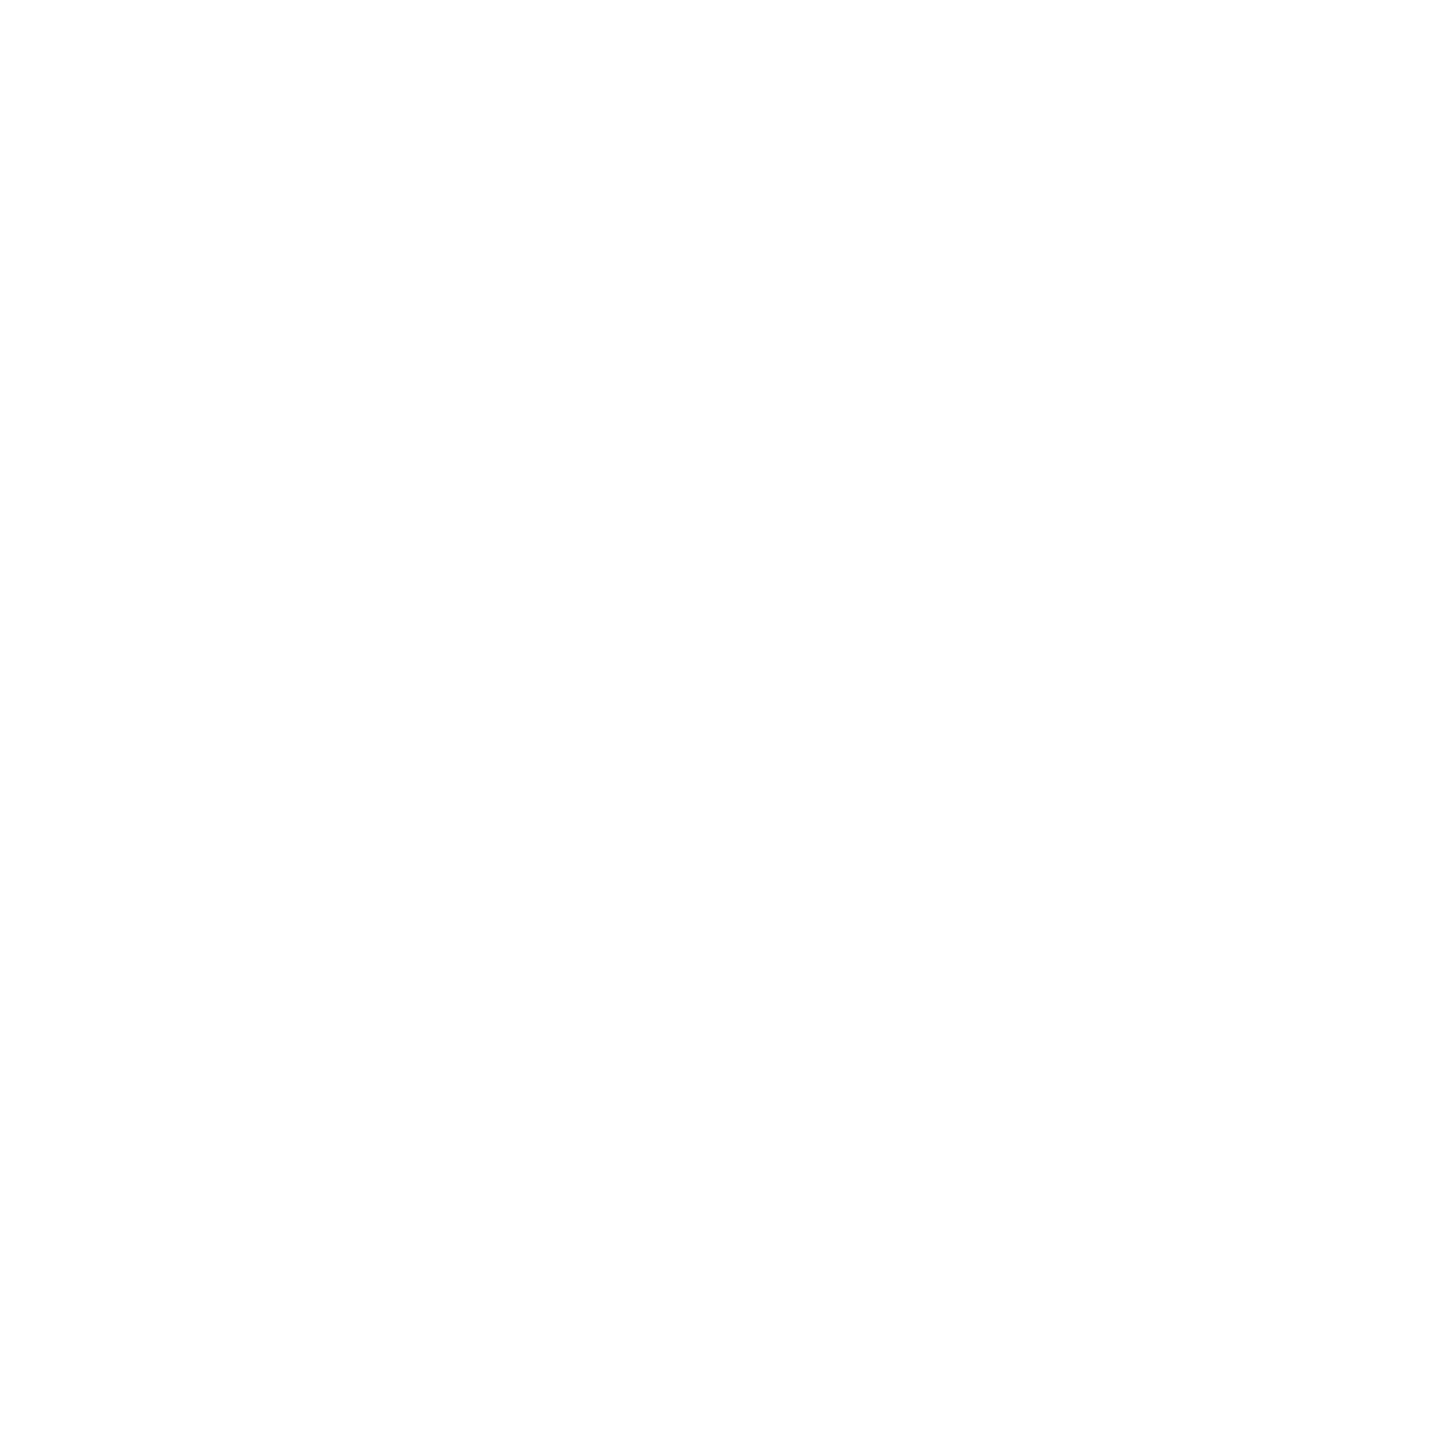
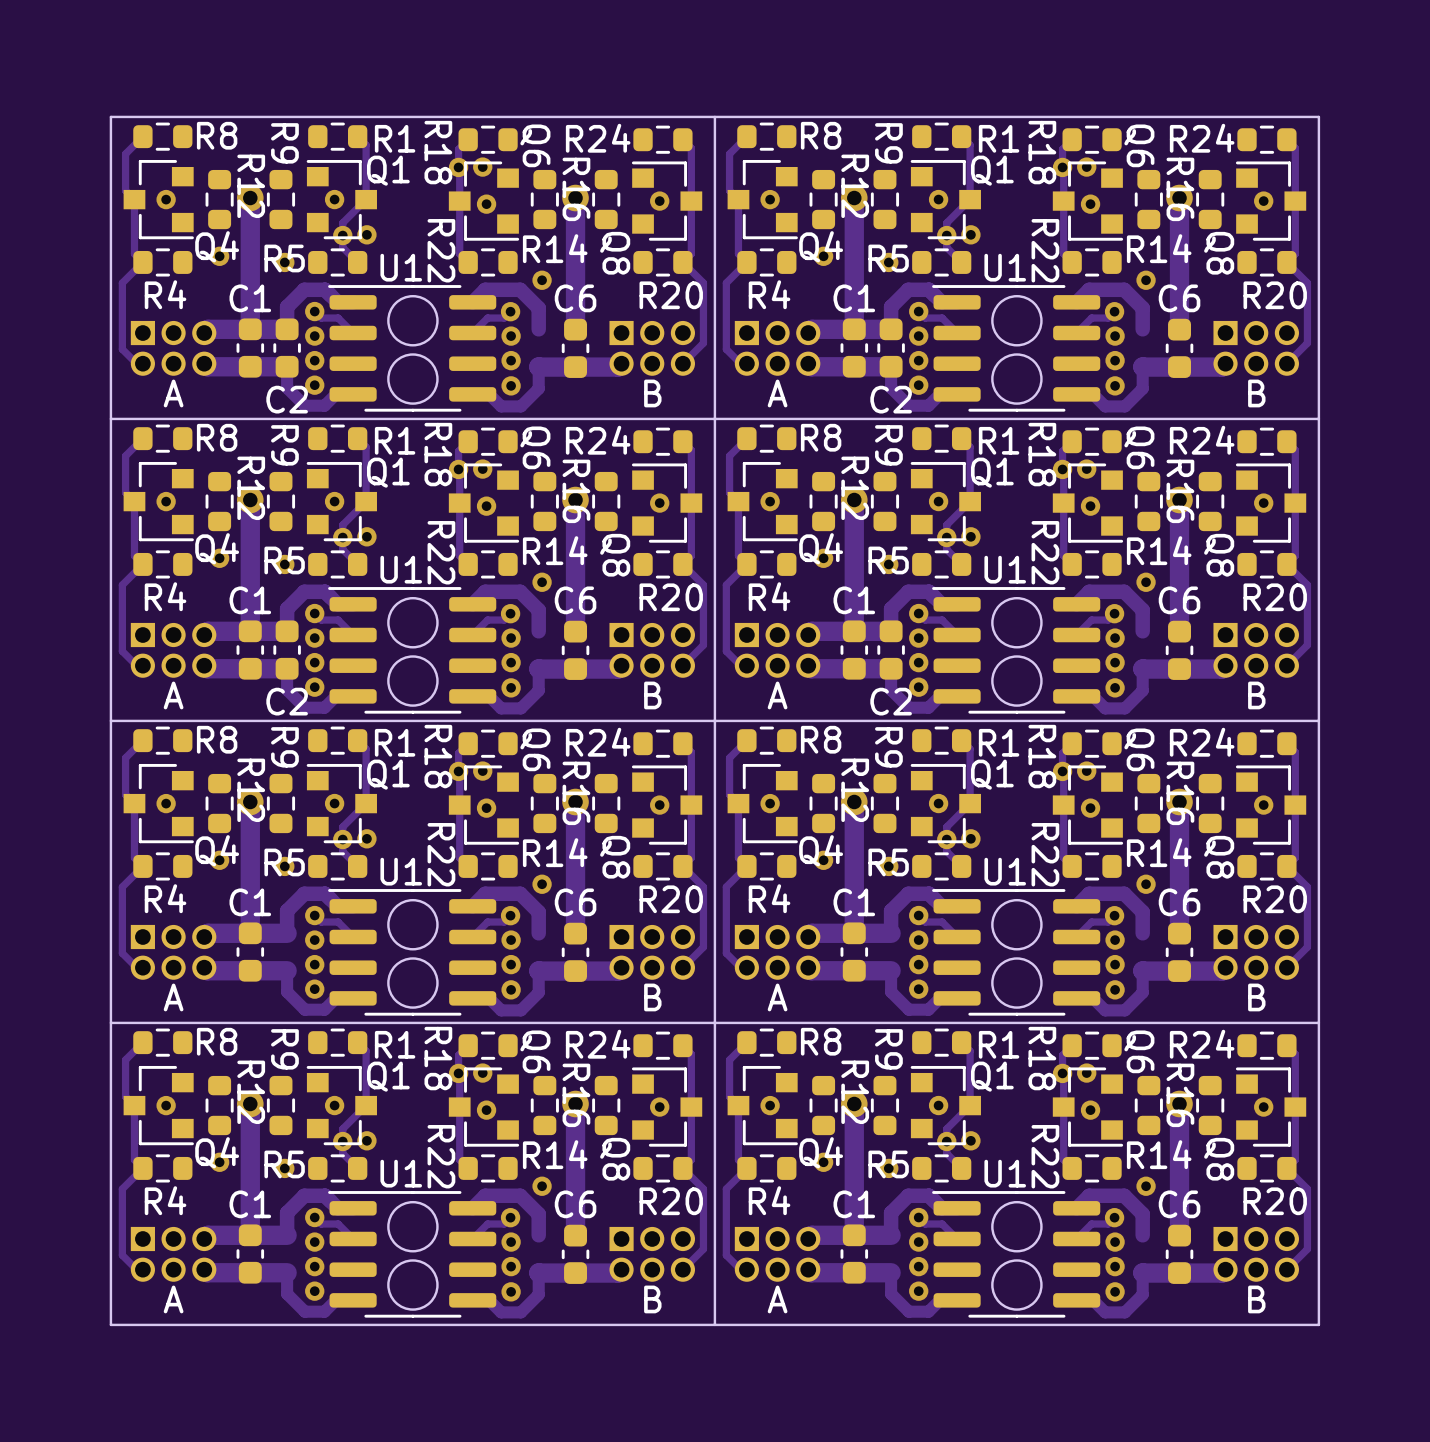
board edge: none -> (714, 116) (714, 1324)
board edge: none -> (1318, 116) (1318, 1324) (110, 1324) (110, 116) (1318, 116)
track: none -> (142, 136) (125, 153) (125, 190) (134, 199) (134, 253) (142, 262) (122, 283) (122, 349) (136, 363) (142, 363)
R8: none -> (162, 136)
R1: none -> (337, 136)
track: none -> (357, 136) (366, 145) (366, 199) (342, 222) (342, 247) (357, 262)
track: none -> (746, 136) (729, 153) (729, 190) (738, 199) (738, 253) (746, 262) (726, 283) (726, 349) (740, 363) (746, 363)
R8: none -> (766, 136)
R1: none -> (941, 136)
track: none -> (961, 136) (970, 145) (970, 199) (946, 222) (946, 247) (961, 262)
track: none -> (468, 139) (458, 149) (459, 253) (468, 262)
R18: none -> (488, 139)
R24: none -> (662, 139)
track: none -> (682, 139) (691, 148) (691, 253) (682, 262) (703, 283) (703, 343) (682, 363)
track: none -> (1072, 139) (1062, 149) (1063, 253) (1072, 262)
R18: none -> (1092, 139)
R24: none -> (1266, 139)
track: none -> (1286, 139) (1295, 148) (1295, 253) (1286, 262) (1307, 283) (1307, 343) (1286, 363)
via: none -> (458, 167)
via: none -> (482, 167)
via: none -> (1062, 167)
via: none -> (1086, 167)
track: none -> (250, 198) (250, 329)
via: none -> (250, 198)
track: none -> (575, 198) (575, 329)
via: none -> (575, 198)
track: none -> (854, 198) (854, 329)
via: none -> (854, 198)
track: none -> (1179, 198) (1179, 329)
via: none -> (1179, 198)
Q4: none -> (158, 199)
via: none -> (166, 199)
R12: none -> (219, 199)
R9: none -> (280, 199)
via: none -> (334, 199)
Q1: none -> (341, 199)
R14: none -> (544, 199)
R16: none -> (606, 199)
Q4: none -> (762, 199)
via: none -> (770, 199)
R12: none -> (823, 199)
R9: none -> (884, 199)
via: none -> (938, 199)
Q1: none -> (945, 199)
R14: none -> (1148, 199)
R16: none -> (1210, 199)
Q6: none -> (483, 201)
via: none -> (659, 201)
Q8: none -> (667, 201)
Q6: none -> (1087, 201)
via: none -> (1263, 201)
Q8: none -> (1271, 201)
via: none -> (486, 204)
via: none -> (1090, 204)
via: none -> (366, 234)
via: none -> (970, 234)
via: none -> (342, 235)
via: none -> (946, 235)
via: none -> (219, 256)
via: none -> (823, 256)
R4: none -> (162, 262)
via: none -> (284, 262)
R5: none -> (337, 262)
R22: none -> (488, 262)
R20: none -> (662, 262)
R4: none -> (766, 262)
via: none -> (888, 262)
R5: none -> (941, 262)
R22: none -> (1092, 262)
R20: none -> (1266, 262)
via: none -> (542, 280)
via: none -> (1146, 280)
round board edge: none -> [387, 294, 439, 347]
round board edge: none -> [991, 294, 1043, 347]
track: none -> (353, 302) (337, 302) (325, 289) (304, 289) (287, 306) (287, 329) (207, 329) (204, 333)
track: none -> (472, 302) (485, 289) (520, 289) (538, 308) (538, 329)
track: none -> (957, 302) (941, 302) (929, 289) (908, 289) (891, 306) (891, 329) (811, 329) (808, 333)
track: none -> (1076, 302) (1089, 289) (1124, 289) (1142, 308) (1142, 329)
track: none -> (314, 311) (321, 318) (338, 318) (353, 333)
via: none -> (314, 311)
track: none -> (510, 311) (504, 318) (487, 318) (472, 333)
via: none -> (510, 311)
track: none -> (918, 311) (925, 318) (942, 318) (957, 333)
via: none -> (918, 311)
track: none -> (1114, 311) (1108, 318) (1091, 318) (1076, 333)
via: none -> (1114, 311)
via: none -> (314, 336)
via: none -> (511, 336)
via: none -> (918, 336)
via: none -> (1115, 336)
part: none -> (173, 348)
C1: none -> (250, 348)
C2: none -> (287, 348)
U1: none -> (412, 348)
C6: none -> (575, 348)
part: none -> (652, 348)
part: none -> (777, 348)
C1: none -> (854, 348)
C2: none -> (891, 348)
U1: none -> (1016, 348)
C6: none -> (1179, 348)
part: none -> (1256, 348)
round board edge: none -> [387, 353, 439, 405]
round board edge: none -> [991, 353, 1043, 405]
via: none -> (314, 360)
via: none -> (511, 360)
via: none -> (918, 360)
via: none -> (1115, 360)
track: none -> (204, 363) (207, 366) (287, 366) (287, 387) (304, 405) (324, 405) (335, 394) (353, 394)
track: none -> (621, 363) (618, 367) (539, 367)
track: none -> (808, 363) (811, 366) (891, 366) (891, 387) (908, 405) (928, 405) (939, 394) (957, 394)
track: none -> (1225, 363) (1222, 367) (1143, 367)
track: none -> (538, 366) (538, 388) (520, 406) (501, 406) (489, 394) (472, 394)
track: none -> (1142, 366) (1142, 388) (1124, 406) (1105, 406) (1093, 394) (1076, 394)
via: none -> (314, 385)
via: none -> (511, 385)
via: none -> (918, 385)
via: none -> (1115, 385)
text: none -> A (173, 393)
text: none -> B (652, 393)
text: none -> A (777, 393)
text: none -> B (1256, 393)
board edge: none -> (1318, 418) (110, 418)
track: none -> (142, 438) (125, 455) (125, 492) (134, 501) (134, 555) (142, 564) (122, 585) (122, 651) (136, 665) (142, 665)
R8: none -> (162, 438)
R1: none -> (337, 438)
track: none -> (357, 438) (366, 447) (366, 501) (342, 524) (342, 549) (357, 564)
track: none -> (746, 438) (729, 455) (729, 492) (738, 501) (738, 555) (746, 564) (726, 585) (726, 651) (740, 665) (746, 665)
R8: none -> (766, 438)
R1: none -> (941, 438)
track: none -> (961, 438) (970, 447) (970, 501) (946, 524) (946, 549) (961, 564)
track: none -> (468, 441) (458, 451) (459, 555) (468, 564)
R18: none -> (488, 441)
R24: none -> (662, 441)
track: none -> (682, 441) (691, 450) (691, 555) (682, 564) (703, 585) (703, 645) (682, 665)
track: none -> (1072, 441) (1062, 451) (1063, 555) (1072, 564)
R18: none -> (1092, 441)
R24: none -> (1266, 441)
track: none -> (1286, 441) (1295, 450) (1295, 555) (1286, 564) (1307, 585) (1307, 645) (1286, 665)
via: none -> (458, 469)
via: none -> (482, 469)
via: none -> (1062, 469)
via: none -> (1086, 469)
track: none -> (250, 500) (250, 631)
via: none -> (250, 500)
track: none -> (575, 500) (575, 631)
via: none -> (575, 500)
track: none -> (854, 500) (854, 631)
via: none -> (854, 500)
track: none -> (1179, 500) (1179, 631)
via: none -> (1179, 500)
Q4: none -> (158, 501)
via: none -> (166, 501)
R12: none -> (219, 501)
R9: none -> (280, 501)
via: none -> (334, 501)
Q1: none -> (341, 501)
R14: none -> (544, 501)
R16: none -> (606, 501)
Q4: none -> (762, 501)
via: none -> (770, 501)
R12: none -> (823, 501)
R9: none -> (884, 501)
via: none -> (938, 501)
Q1: none -> (945, 501)
R14: none -> (1148, 501)
R16: none -> (1210, 501)
Q6: none -> (483, 503)
via: none -> (659, 503)
Q8: none -> (667, 503)
Q6: none -> (1087, 503)
via: none -> (1263, 503)
Q8: none -> (1271, 503)
via: none -> (486, 506)
via: none -> (1090, 506)
via: none -> (366, 536)
via: none -> (970, 536)
via: none -> (342, 537)
via: none -> (946, 537)
via: none -> (219, 558)
via: none -> (823, 558)
R4: none -> (162, 564)
via: none -> (284, 564)
R5: none -> (337, 564)
R22: none -> (488, 564)
R20: none -> (662, 564)
R4: none -> (766, 564)
via: none -> (888, 564)
R5: none -> (941, 564)
R22: none -> (1092, 564)
R20: none -> (1266, 564)
via: none -> (542, 582)
via: none -> (1146, 582)
round board edge: none -> [387, 596, 439, 649]
round board edge: none -> [991, 596, 1043, 649]
track: none -> (353, 604) (337, 604) (325, 591) (304, 591) (287, 608) (287, 631) (207, 631) (204, 635)
track: none -> (472, 604) (485, 591) (520, 591) (538, 610) (538, 631)
track: none -> (957, 604) (941, 604) (929, 591) (908, 591) (891, 608) (891, 631) (811, 631) (808, 635)
track: none -> (1076, 604) (1089, 591) (1124, 591) (1142, 610) (1142, 631)
track: none -> (314, 613) (321, 620) (338, 620) (353, 635)
via: none -> (314, 613)
track: none -> (510, 613) (504, 620) (487, 620) (472, 635)
via: none -> (510, 613)
track: none -> (918, 613) (925, 620) (942, 620) (957, 635)
via: none -> (918, 613)
track: none -> (1114, 613) (1108, 620) (1091, 620) (1076, 635)
via: none -> (1114, 613)
via: none -> (314, 638)
via: none -> (511, 638)
via: none -> (918, 638)
via: none -> (1115, 638)
part: none -> (173, 650)
C1: none -> (250, 650)
C2: none -> (287, 650)
U1: none -> (412, 650)
C6: none -> (575, 650)
part: none -> (652, 650)
part: none -> (777, 650)
C1: none -> (854, 650)
C2: none -> (891, 650)
U1: none -> (1016, 650)
C6: none -> (1179, 650)
part: none -> (1256, 650)
round board edge: none -> [387, 655, 439, 707]
round board edge: none -> [991, 655, 1043, 707]
via: none -> (314, 662)
via: none -> (511, 662)
via: none -> (918, 662)
via: none -> (1115, 662)
track: none -> (204, 665) (207, 668) (287, 668) (287, 689) (304, 707) (324, 707) (335, 696) (353, 696)
track: none -> (621, 665) (618, 669) (539, 669)
track: none -> (808, 665) (811, 668) (891, 668) (891, 689) (908, 707) (928, 707) (939, 696) (957, 696)
track: none -> (1225, 665) (1222, 669) (1143, 669)
track: none -> (538, 668) (538, 690) (520, 708) (501, 708) (489, 696) (472, 696)
track: none -> (1142, 668) (1142, 690) (1124, 708) (1105, 708) (1093, 696) (1076, 696)
via: none -> (314, 687)
via: none -> (511, 687)
via: none -> (918, 687)
via: none -> (1115, 687)
text: none -> A (173, 695)
text: none -> B (652, 695)
text: none -> A (777, 695)
text: none -> B (1256, 695)
board edge: none -> (1318, 720) (110, 720)
track: none -> (142, 740) (125, 757) (125, 794) (134, 803) (134, 857) (142, 866) (122, 886) (122, 953) (136, 967) (142, 967)
R8: none -> (162, 740)
R1: none -> (337, 740)
track: none -> (357, 740) (366, 749) (366, 803) (342, 826) (342, 851) (357, 866)
track: none -> (746, 740) (729, 757) (729, 794) (738, 803) (738, 857) (746, 866) (726, 886) (726, 953) (740, 967) (746, 967)
R8: none -> (766, 740)
R1: none -> (941, 740)
track: none -> (961, 740) (970, 749) (970, 803) (946, 826) (946, 851) (961, 866)
track: none -> (468, 743) (458, 753) (459, 857) (468, 866)
R18: none -> (488, 743)
R24: none -> (662, 743)
track: none -> (682, 743) (691, 752) (691, 857) (682, 866) (703, 886) (703, 947) (682, 967)
track: none -> (1072, 743) (1062, 753) (1063, 857) (1072, 866)
R18: none -> (1092, 743)
R24: none -> (1266, 743)
track: none -> (1286, 743) (1295, 752) (1295, 857) (1286, 866) (1307, 886) (1307, 947) (1286, 967)
via: none -> (458, 771)
via: none -> (482, 771)
via: none -> (1062, 771)
via: none -> (1086, 771)
track: none -> (250, 802) (250, 933)
via: none -> (250, 802)
track: none -> (575, 802) (575, 933)
via: none -> (575, 802)
track: none -> (854, 802) (854, 933)
via: none -> (854, 802)
track: none -> (1179, 802) (1179, 933)
via: none -> (1179, 802)
Q4: none -> (158, 803)
via: none -> (166, 803)
R12: none -> (219, 803)
R9: none -> (280, 803)
via: none -> (334, 803)
Q1: none -> (341, 803)
R14: none -> (544, 803)
R16: none -> (606, 803)
Q4: none -> (762, 803)
via: none -> (770, 803)
R12: none -> (823, 803)
R9: none -> (884, 803)
via: none -> (938, 803)
Q1: none -> (945, 803)
R14: none -> (1148, 803)
R16: none -> (1210, 803)
Q6: none -> (483, 805)
via: none -> (659, 805)
Q8: none -> (667, 805)
Q6: none -> (1087, 805)
via: none -> (1263, 805)
Q8: none -> (1271, 805)
via: none -> (486, 808)
via: none -> (1090, 808)
via: none -> (366, 838)
via: none -> (970, 838)
via: none -> (342, 839)
via: none -> (946, 839)
via: none -> (219, 860)
via: none -> (823, 860)
R4: none -> (162, 866)
via: none -> (284, 866)
R5: none -> (337, 866)
R22: none -> (488, 866)
R20: none -> (662, 866)
R4: none -> (766, 866)
via: none -> (888, 866)
R5: none -> (941, 866)
R22: none -> (1092, 866)
R20: none -> (1266, 866)
via: none -> (542, 884)
via: none -> (1146, 884)
round board edge: none -> [387, 898, 439, 951]
round board edge: none -> [991, 898, 1043, 951]
track: none -> (353, 906) (337, 906) (325, 893) (304, 893) (287, 910) (287, 933) (207, 933) (204, 937)
track: none -> (472, 906) (485, 893) (520, 893) (538, 912) (538, 933)
track: none -> (957, 906) (941, 906) (929, 893) (908, 893) (891, 910) (891, 933) (811, 933) (808, 937)
track: none -> (1076, 906) (1089, 893) (1124, 893) (1142, 912) (1142, 933)
track: none -> (314, 915) (321, 922) (338, 922) (353, 937)
via: none -> (314, 915)
track: none -> (510, 915) (504, 922) (487, 922) (472, 937)
via: none -> (510, 915)
track: none -> (918, 915) (925, 922) (942, 922) (957, 937)
via: none -> (918, 915)
track: none -> (1114, 915) (1108, 922) (1091, 922) (1076, 937)
via: none -> (1114, 915)
via: none -> (314, 940)
via: none -> (511, 940)
via: none -> (918, 940)
via: none -> (1115, 940)
part: none -> (173, 952)
C1: none -> (250, 952)
U1: none -> (412, 952)
C6: none -> (575, 952)
part: none -> (652, 952)
part: none -> (777, 952)
C1: none -> (854, 952)
U1: none -> (1016, 952)
C6: none -> (1179, 952)
part: none -> (1256, 952)
round board edge: none -> [387, 957, 439, 1009]
round board edge: none -> [991, 957, 1043, 1009]
via: none -> (314, 964)
via: none -> (511, 964)
via: none -> (918, 964)
via: none -> (1115, 964)
track: none -> (204, 967) (207, 970) (287, 970) (287, 991) (304, 1009) (324, 1009) (335, 998) (353, 998)
track: none -> (621, 967) (618, 971) (539, 971)
track: none -> (808, 967) (811, 970) (891, 970) (891, 991) (908, 1009) (928, 1009) (939, 998) (957, 998)
track: none -> (1225, 967) (1222, 971) (1143, 971)
track: none -> (538, 970) (538, 992) (520, 1010) (501, 1010) (489, 998) (472, 998)
track: none -> (1142, 970) (1142, 992) (1124, 1010) (1105, 1010) (1093, 998) (1076, 998)
via: none -> (314, 989)
via: none -> (511, 989)
via: none -> (918, 989)
via: none -> (1115, 989)
text: none -> A (173, 997)
text: none -> B (652, 997)
text: none -> A (777, 997)
text: none -> B (1256, 997)
board edge: none -> (1318, 1022) (110, 1022)
track: none -> (142, 1042) (125, 1059) (125, 1096) (134, 1105) (134, 1159) (142, 1168) (122, 1188) (122, 1255) (136, 1269) (142, 1269)
R8: none -> (162, 1042)
R1: none -> (337, 1042)
track: none -> (357, 1042) (366, 1051) (366, 1105) (342, 1128) (342, 1153) (357, 1168)
track: none -> (746, 1042) (729, 1059) (729, 1096) (738, 1105) (738, 1159) (746, 1168) (726, 1188) (726, 1255) (740, 1269) (746, 1269)
R8: none -> (766, 1042)
R1: none -> (941, 1042)
track: none -> (961, 1042) (970, 1051) (970, 1105) (946, 1128) (946, 1153) (961, 1168)
track: none -> (468, 1045) (458, 1055) (459, 1159) (468, 1168)
R18: none -> (488, 1045)
R24: none -> (662, 1045)
track: none -> (682, 1045) (691, 1054) (691, 1159) (682, 1168) (703, 1188) (703, 1249) (682, 1269)
track: none -> (1072, 1045) (1062, 1055) (1063, 1159) (1072, 1168)
R18: none -> (1092, 1045)
R24: none -> (1266, 1045)
track: none -> (1286, 1045) (1295, 1054) (1295, 1159) (1286, 1168) (1307, 1188) (1307, 1249) (1286, 1269)
via: none -> (458, 1073)
via: none -> (482, 1073)
via: none -> (1062, 1073)
via: none -> (1086, 1073)
track: none -> (250, 1103) (250, 1235)
via: none -> (250, 1103)
track: none -> (575, 1103) (575, 1235)
via: none -> (575, 1103)
track: none -> (854, 1103) (854, 1235)
via: none -> (854, 1103)
track: none -> (1179, 1103) (1179, 1235)
via: none -> (1179, 1103)
Q4: none -> (158, 1105)
via: none -> (166, 1105)
R12: none -> (219, 1105)
R9: none -> (280, 1105)
via: none -> (334, 1105)
Q1: none -> (341, 1105)
R14: none -> (544, 1105)
R16: none -> (606, 1105)
Q4: none -> (762, 1105)
via: none -> (770, 1105)
R12: none -> (823, 1105)
R9: none -> (884, 1105)
via: none -> (938, 1105)
Q1: none -> (945, 1105)
R14: none -> (1148, 1105)
R16: none -> (1210, 1105)
Q6: none -> (483, 1107)
via: none -> (659, 1107)
Q8: none -> (667, 1107)
Q6: none -> (1087, 1107)
via: none -> (1263, 1107)
Q8: none -> (1271, 1107)
via: none -> (486, 1110)
via: none -> (1090, 1110)
via: none -> (366, 1140)
via: none -> (970, 1140)
via: none -> (342, 1141)
via: none -> (946, 1141)
via: none -> (219, 1162)
via: none -> (823, 1162)
R4: none -> (162, 1168)
via: none -> (284, 1168)
R5: none -> (337, 1168)
R22: none -> (488, 1168)
R20: none -> (662, 1168)
R4: none -> (766, 1168)
via: none -> (888, 1168)
R5: none -> (941, 1168)
R22: none -> (1092, 1168)
R20: none -> (1266, 1168)
via: none -> (542, 1186)
via: none -> (1146, 1186)
round board edge: none -> [387, 1200, 439, 1253]
round board edge: none -> [991, 1200, 1043, 1253]
track: none -> (353, 1208) (337, 1208) (325, 1195) (304, 1195) (287, 1212) (287, 1235) (207, 1235) (204, 1239)
track: none -> (472, 1208) (485, 1195) (520, 1195) (538, 1214) (538, 1235)
track: none -> (957, 1208) (941, 1208) (929, 1195) (908, 1195) (891, 1212) (891, 1235) (811, 1235) (808, 1239)
track: none -> (1076, 1208) (1089, 1195) (1124, 1195) (1142, 1214) (1142, 1235)
track: none -> (314, 1217) (321, 1224) (338, 1224) (353, 1239)
via: none -> (314, 1217)
track: none -> (510, 1217) (504, 1224) (487, 1224) (472, 1239)
via: none -> (510, 1217)
track: none -> (918, 1217) (925, 1224) (942, 1224) (957, 1239)
via: none -> (918, 1217)
track: none -> (1114, 1217) (1108, 1224) (1091, 1224) (1076, 1239)
via: none -> (1114, 1217)
via: none -> (314, 1242)
via: none -> (511, 1242)
via: none -> (918, 1242)
via: none -> (1115, 1242)
part: none -> (173, 1254)
C1: none -> (250, 1254)
U1: none -> (412, 1254)
C6: none -> (575, 1254)
part: none -> (652, 1254)
part: none -> (777, 1254)
C1: none -> (854, 1254)
U1: none -> (1016, 1254)
C6: none -> (1179, 1254)
part: none -> (1256, 1254)
round board edge: none -> [387, 1259, 439, 1311]
round board edge: none -> [991, 1259, 1043, 1311]
via: none -> (314, 1266)
via: none -> (511, 1266)
via: none -> (918, 1266)
via: none -> (1115, 1266)
track: none -> (204, 1269) (207, 1272) (287, 1272) (287, 1293) (304, 1311) (324, 1311) (335, 1300) (353, 1300)
track: none -> (621, 1269) (618, 1273) (539, 1273)
track: none -> (808, 1269) (811, 1272) (891, 1272) (891, 1293) (908, 1311) (928, 1311) (939, 1300) (957, 1300)
track: none -> (1225, 1269) (1222, 1273) (1143, 1273)
track: none -> (538, 1272) (538, 1294) (520, 1312) (501, 1312) (489, 1300) (472, 1300)
track: none -> (1142, 1272) (1142, 1294) (1124, 1312) (1105, 1312) (1093, 1300) (1076, 1300)
via: none -> (314, 1291)
via: none -> (511, 1291)
via: none -> (918, 1291)
via: none -> (1115, 1291)
text: none -> A (173, 1299)
text: none -> B (652, 1299)
text: none -> A (777, 1299)
text: none -> B (1256, 1299)

